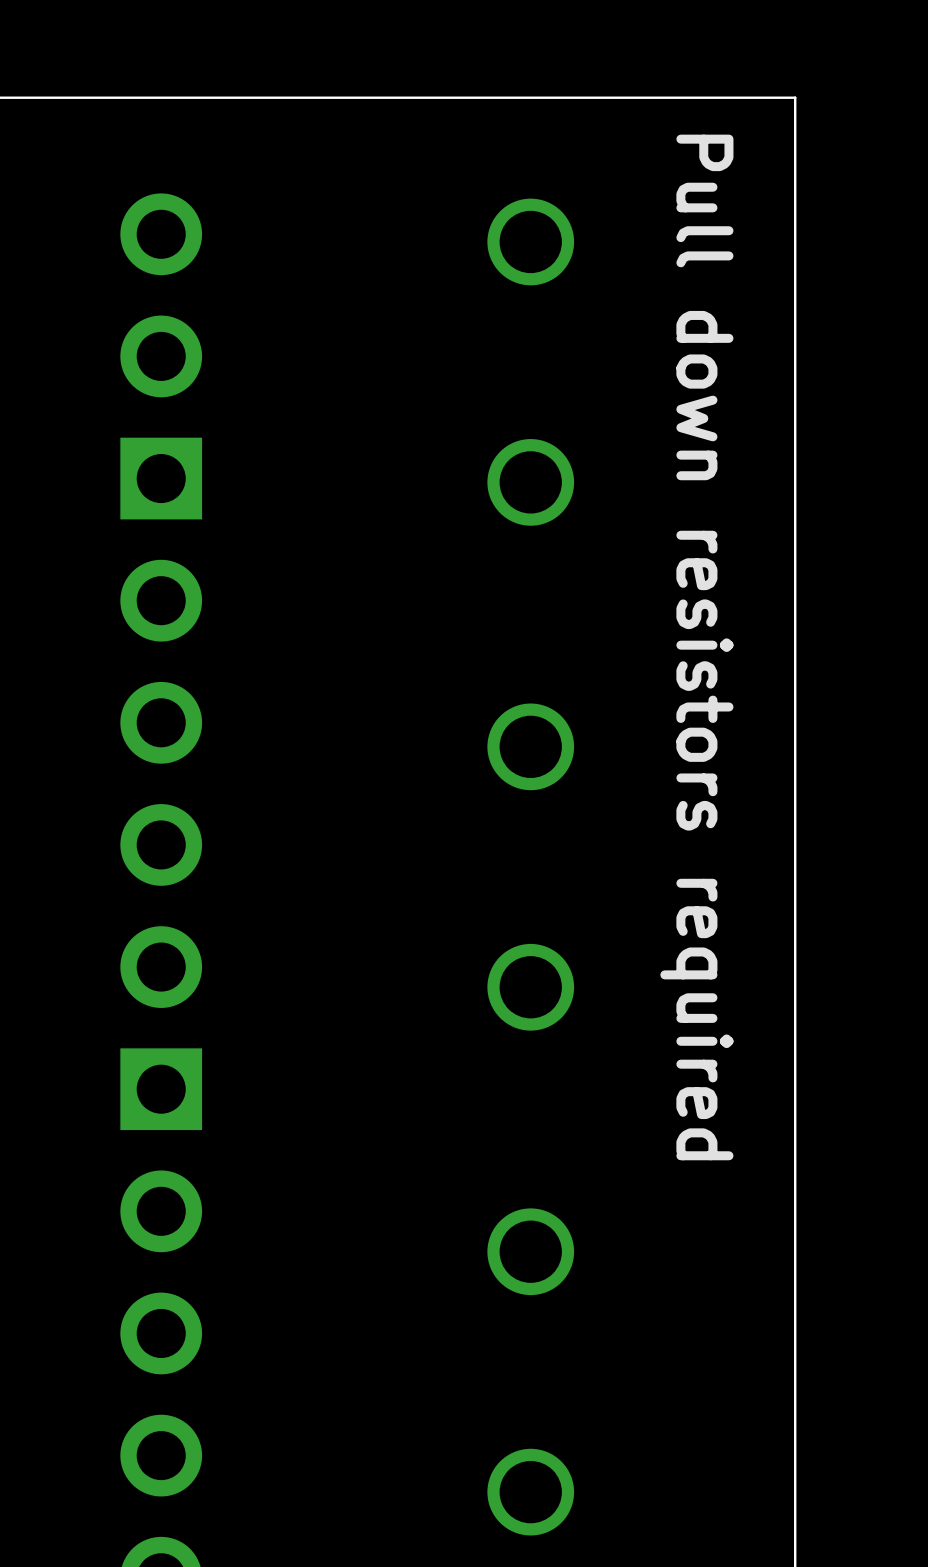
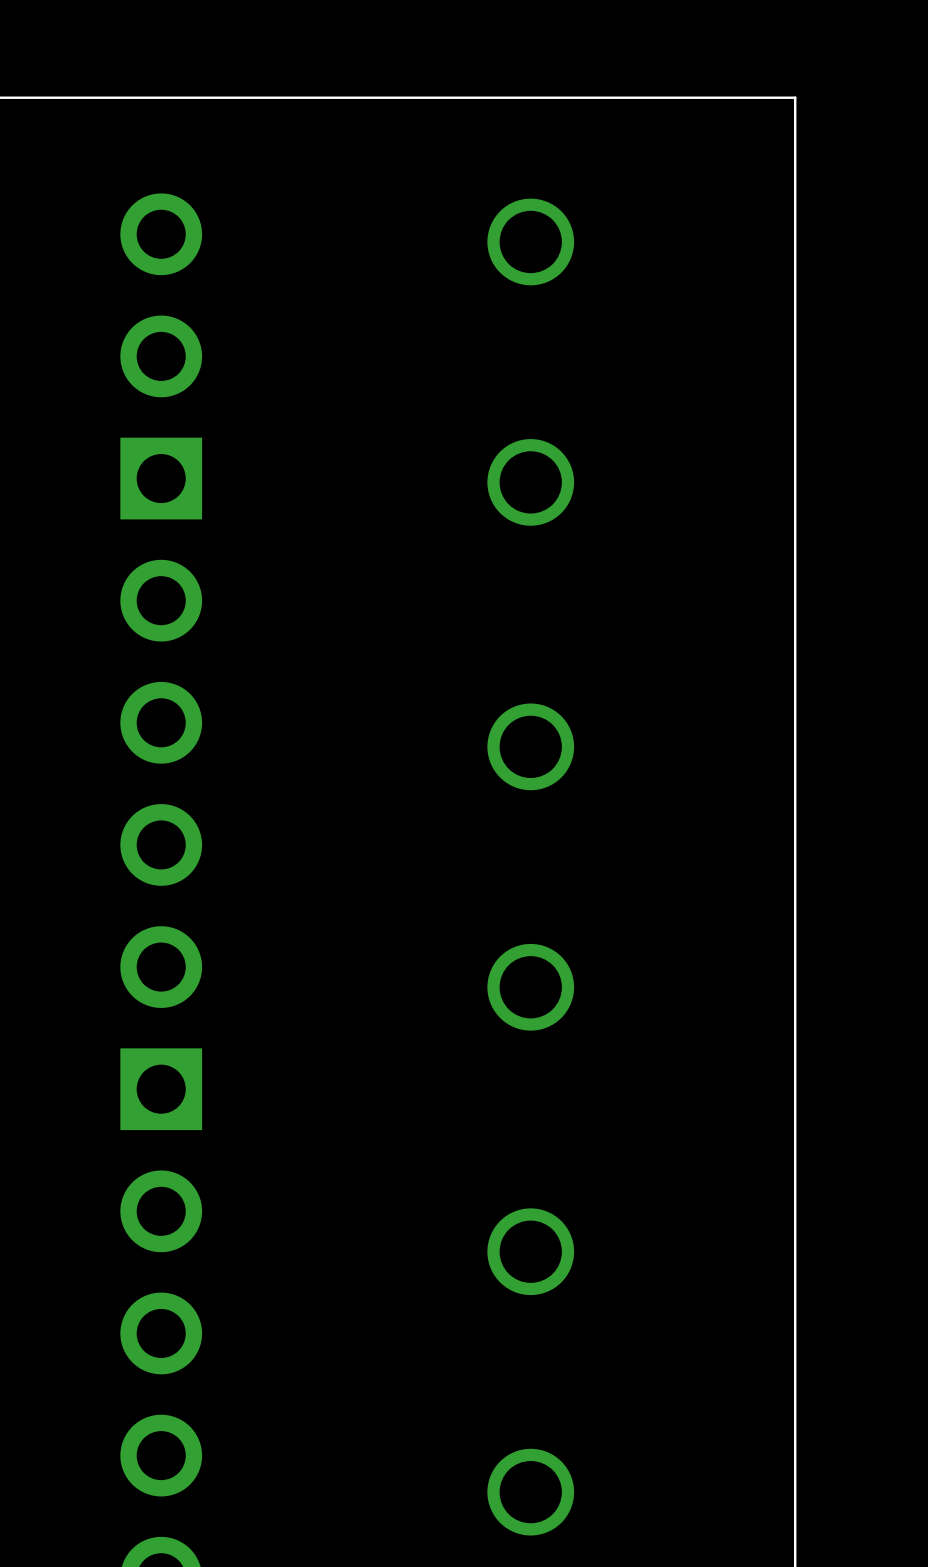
text: Pull down resistors required (696, 647) -> none

